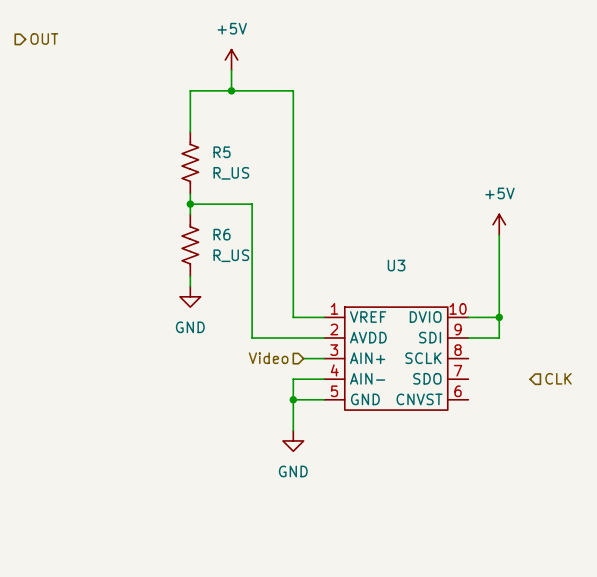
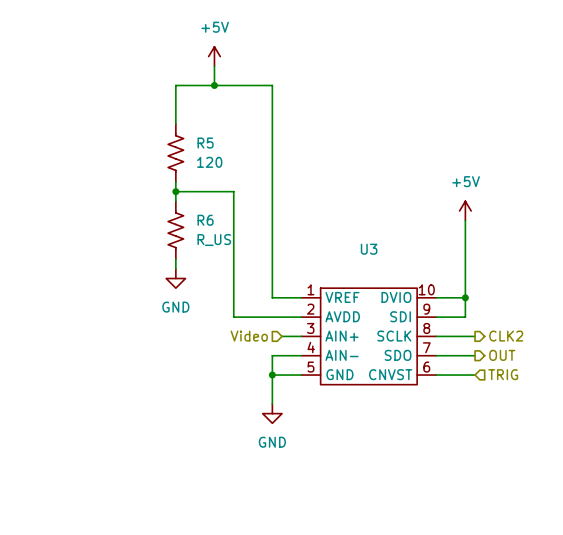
hierarchical label: OUT (44, 38) -> none
R5 value: R_US (231, 173) -> 120 (209, 162)
wire: none -> (436, 336) (475, 336)
hierarchical label: none -> OUT (502, 355)
hierarchical label shape: input (558, 378) -> output (506, 336)
hierarchical label: CLK (558, 378) -> CLK2 (506, 336)
wire: none -> (436, 355) (475, 355)
wire: none -> (436, 375) (475, 375)
hierarchical label: none -> TRIG (503, 374)

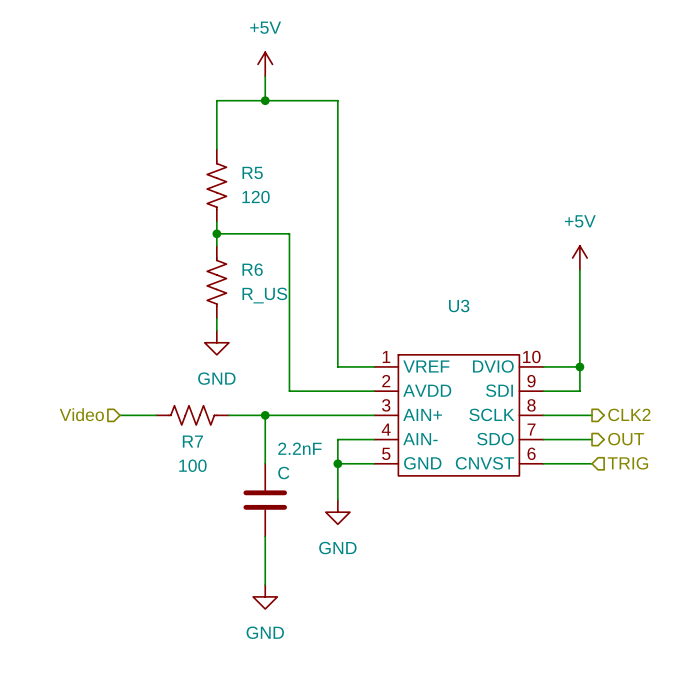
wire: none -> (120, 415) (156, 415)
R7: none -> 100 (192, 415)
wire: none -> (228, 415) (349, 415)
wire: none -> (265, 415) (265, 463)
junction: none -> (265, 415)
hierarchical label position: Video (249, 336) -> Video (81, 414)
2.2nF: none -> C (265, 500)
wire: none -> (265, 536) (265, 584)
power symbol: none -> GND (265, 596)

